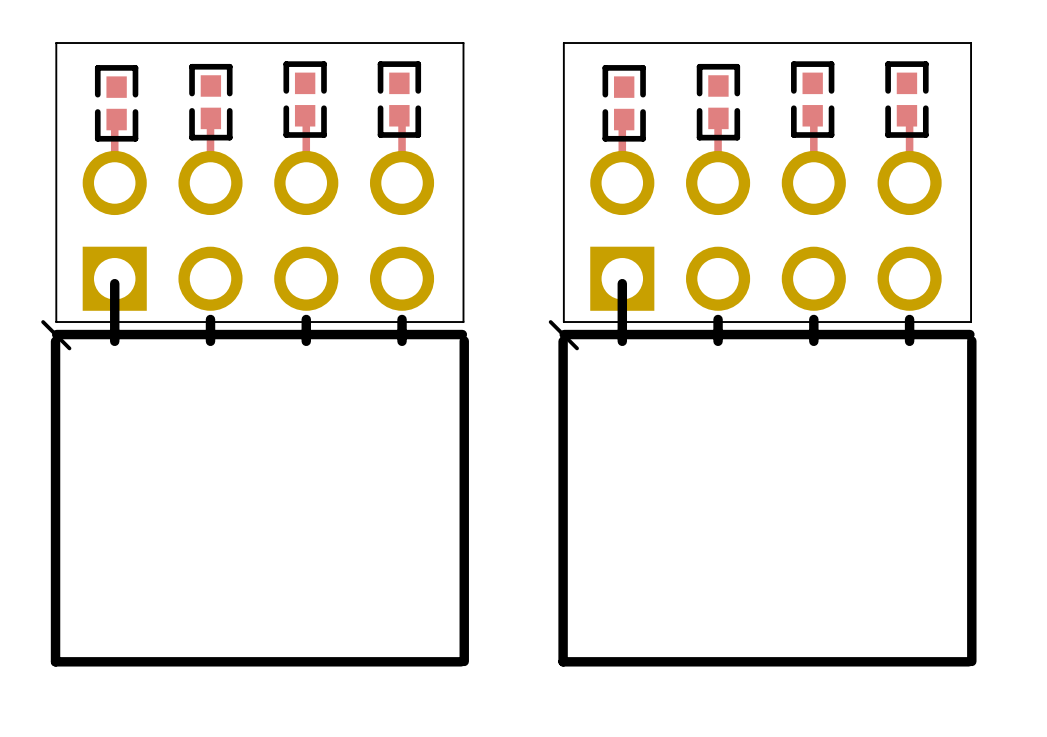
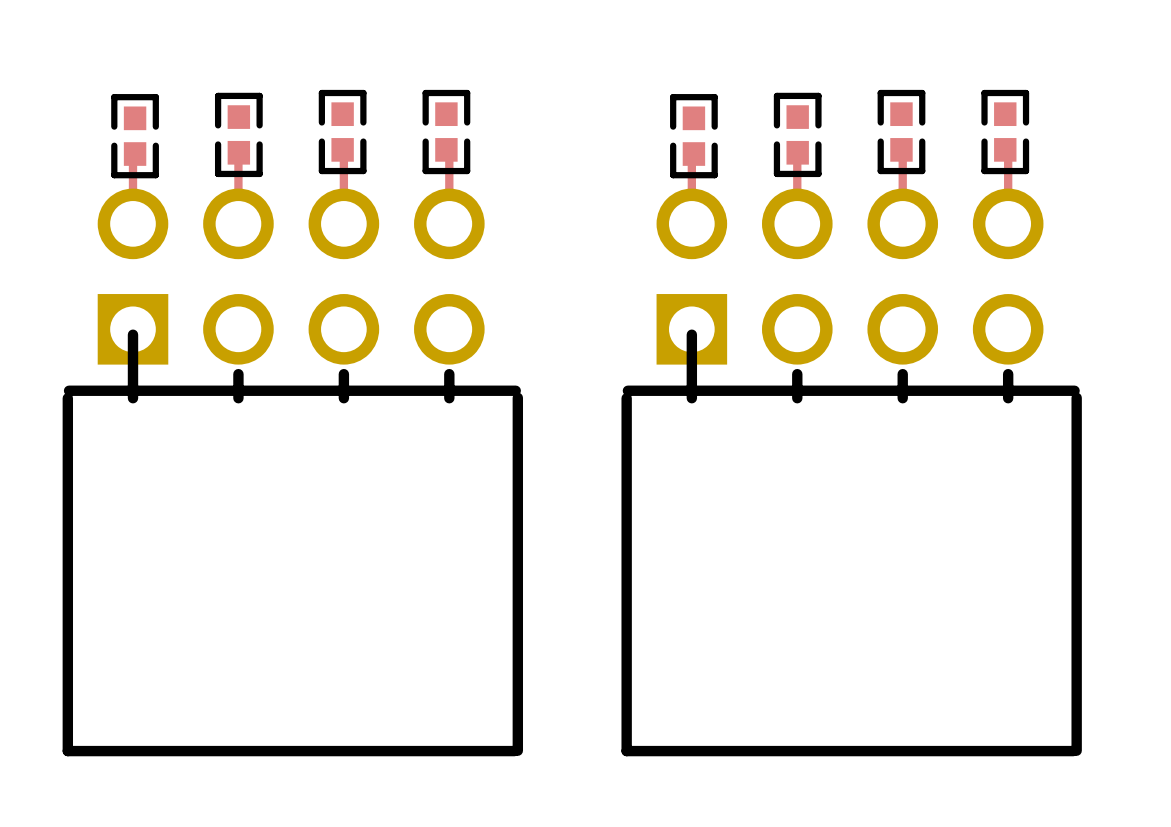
board edge: (56, 43) (463, 43) (463, 322) (56, 322) (56, 43) -> none
board edge: (563, 43) (971, 43) (971, 322) (563, 322) (563, 43) -> none
board edge: (43, 322) (69, 348) -> none
board edge: (550, 322) (577, 348) -> none

